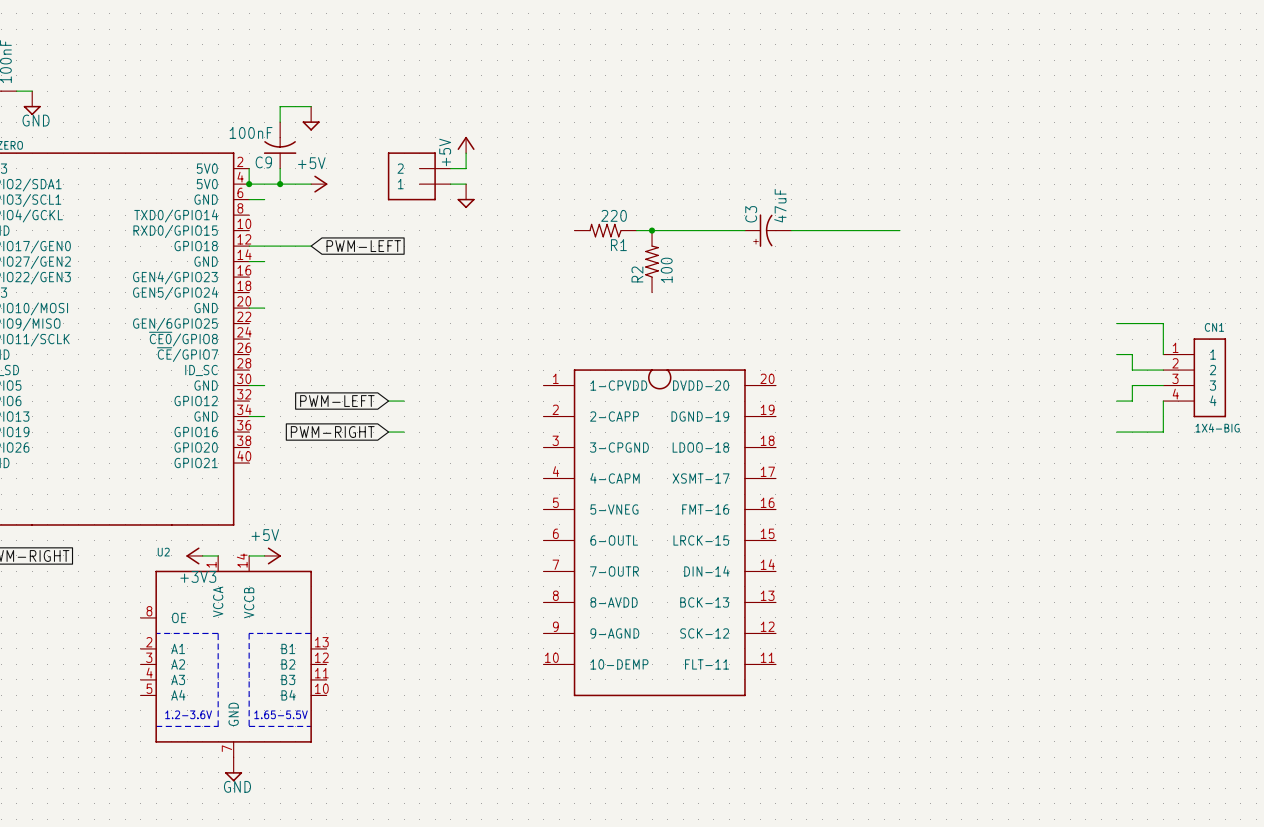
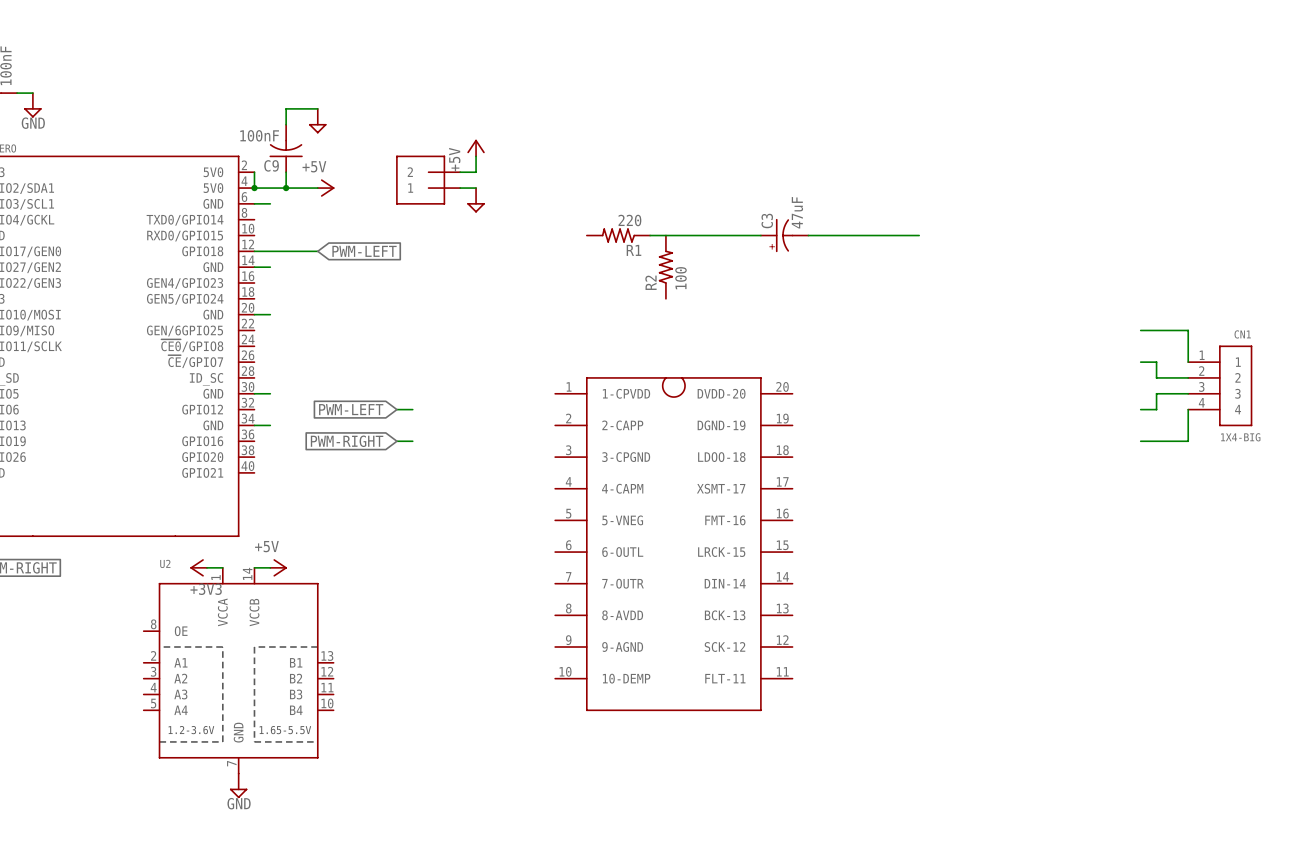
junction: (652, 230) -> none

